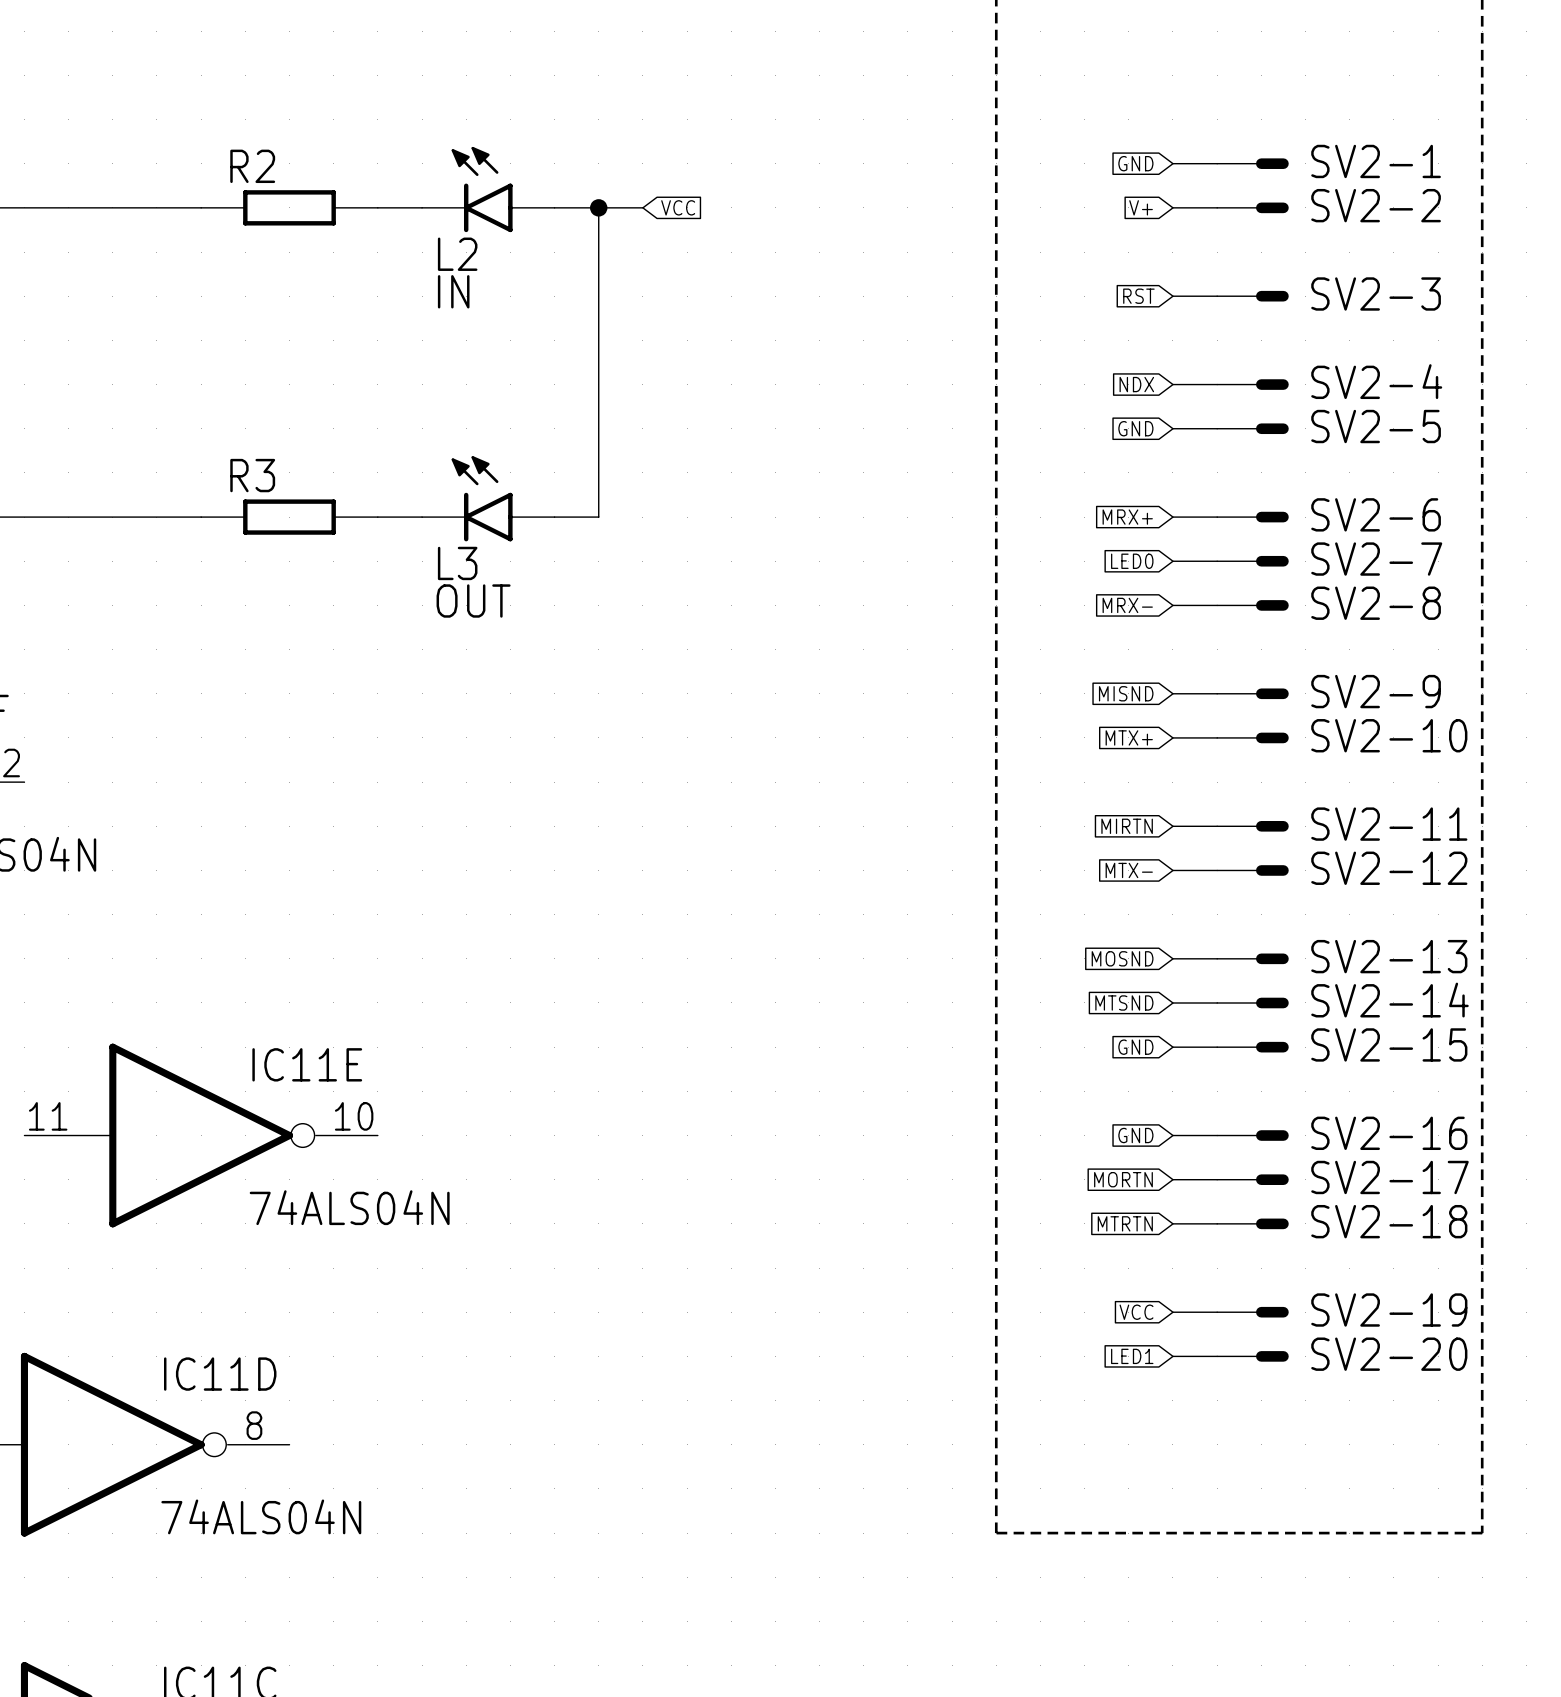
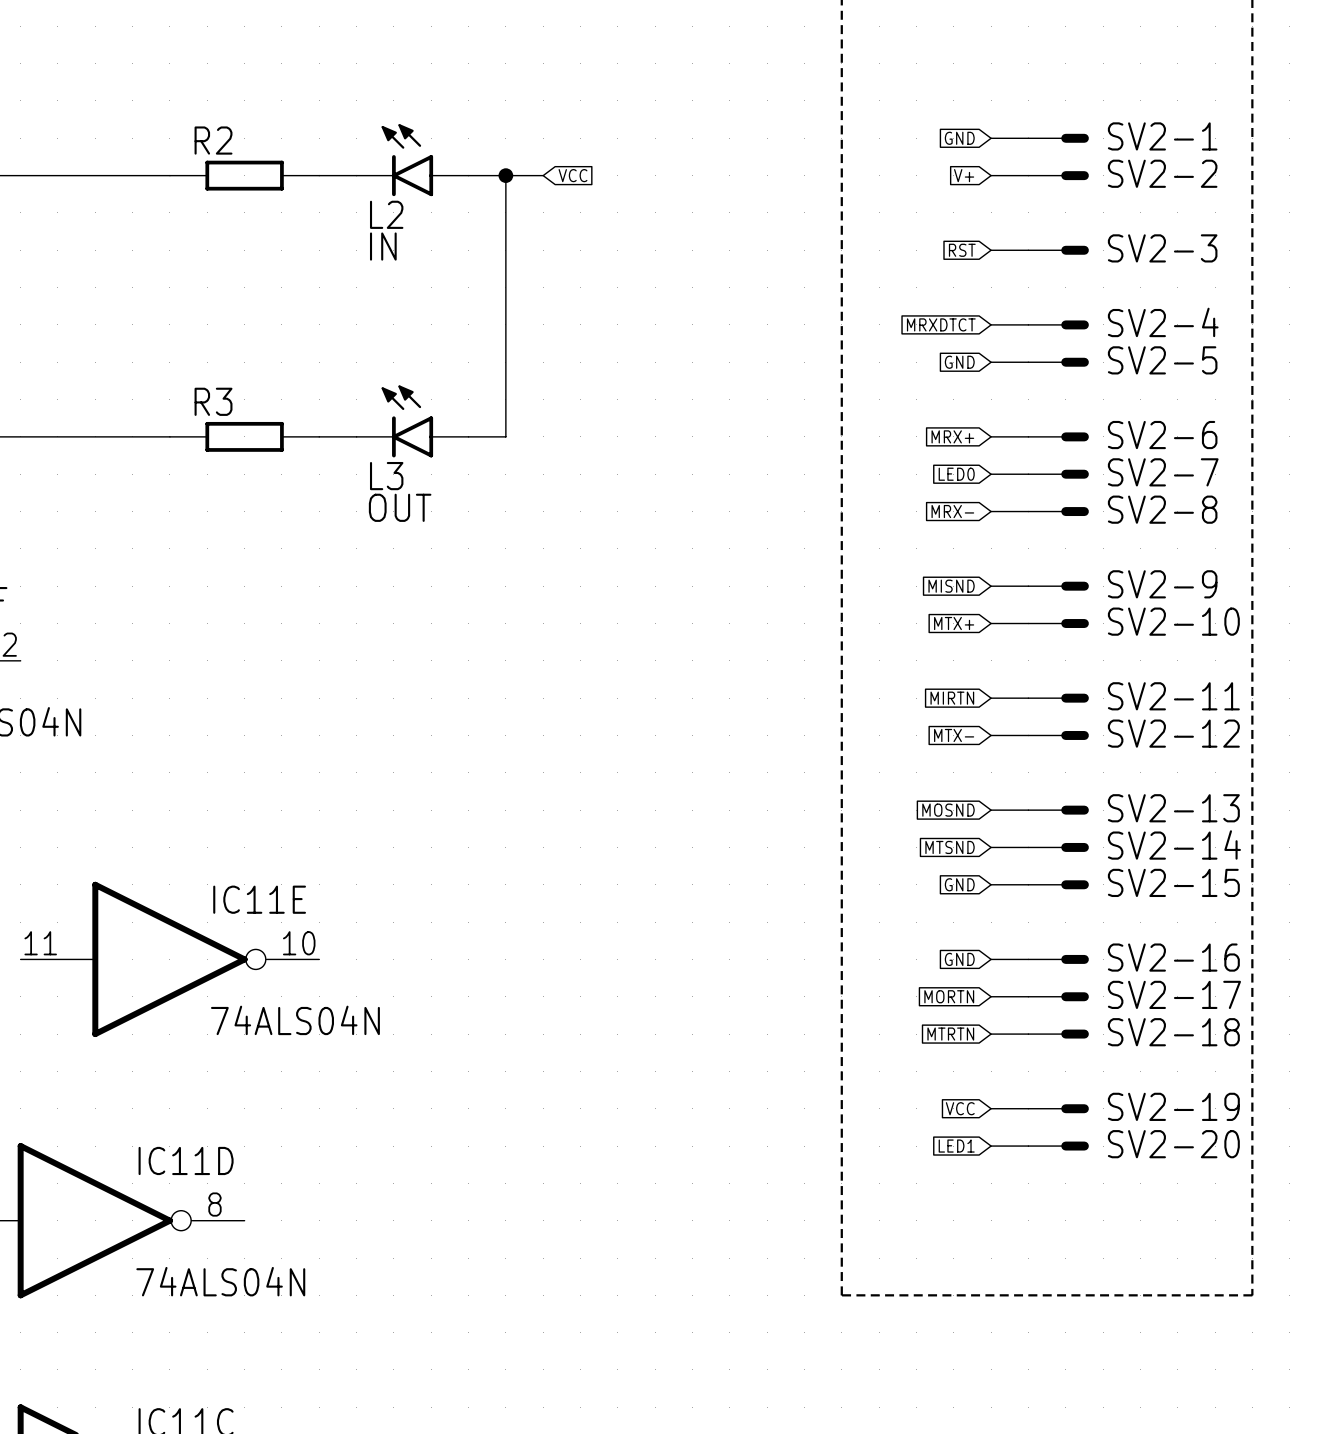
global label: NDX (1136, 384) -> MRXDTCT (941, 324)

